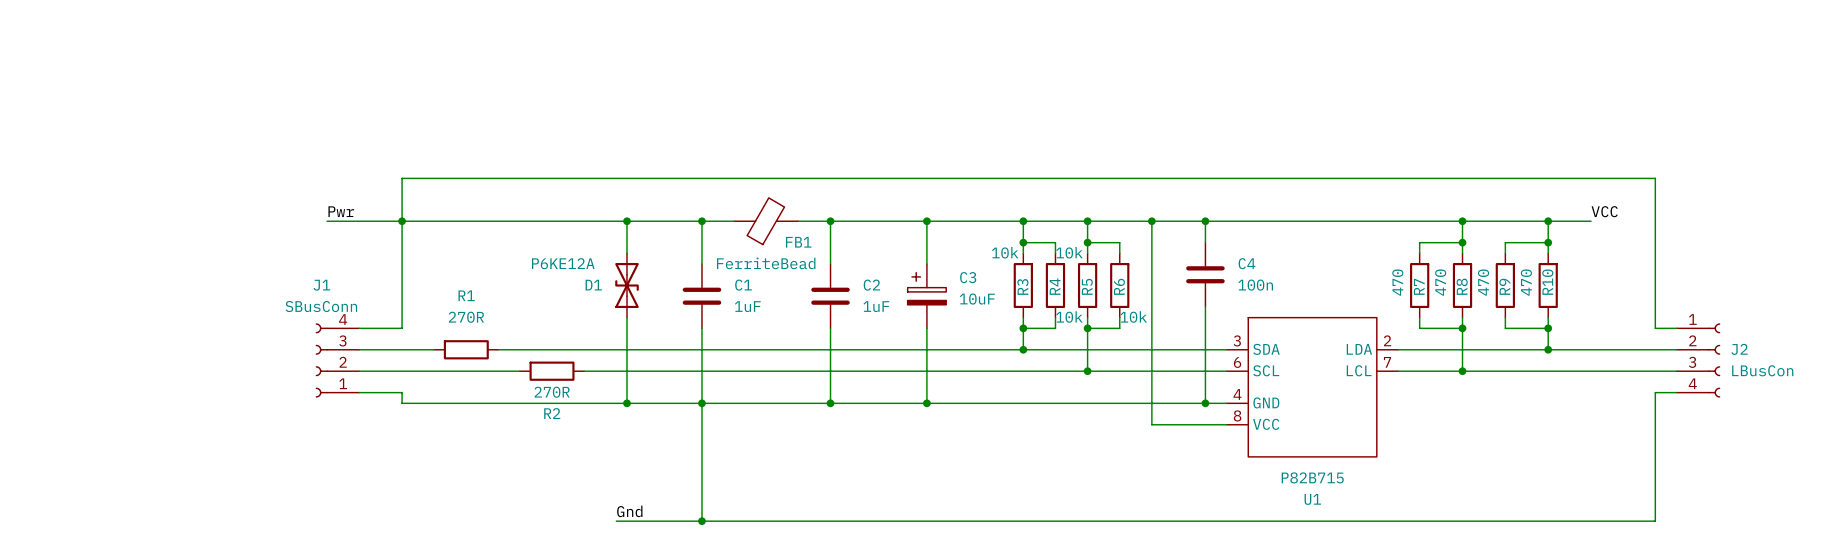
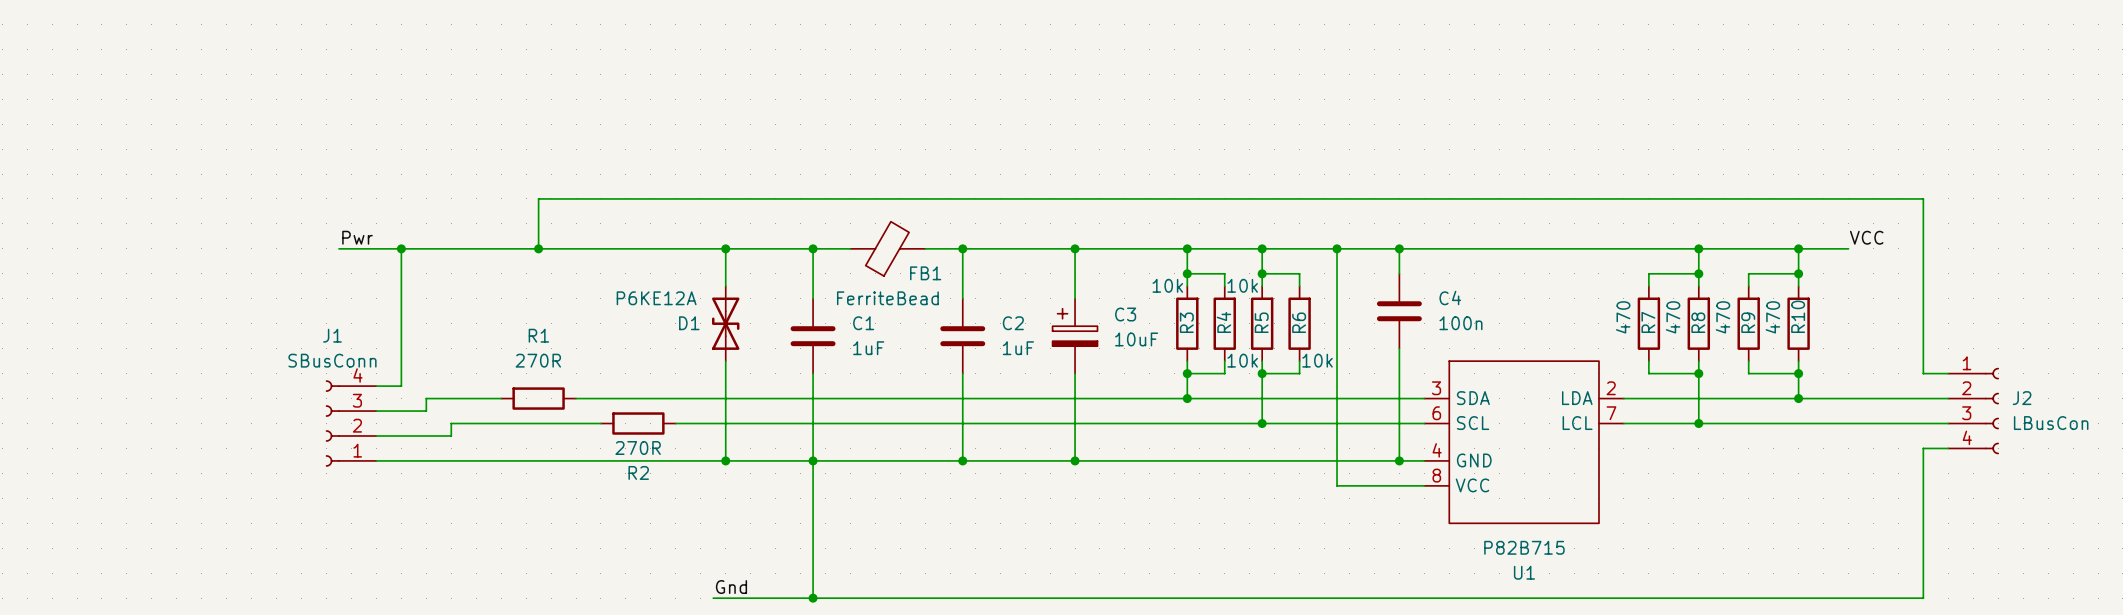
wire: (466, 178) (402, 178) (402, 328) (359, 328) -> (538, 198) (538, 248)
label position: Pwr (341, 211) -> Pwr (357, 237)
wire: none -> (339, 248) (376, 248)
wire: none -> (401, 248) (401, 386) (376, 386)
junction: none -> (401, 248)
junction: (402, 221) -> none
junction: none -> (538, 248)
wire: (359, 349) (369, 349) -> (376, 411) (426, 411) (426, 398)
J1 position: (337, 360) -> (351, 423)
wire: (359, 371) (391, 371) -> (376, 435) (451, 435) (451, 423)
wire: (359, 392) (402, 392) (402, 403) -> (376, 460) (463, 460)

